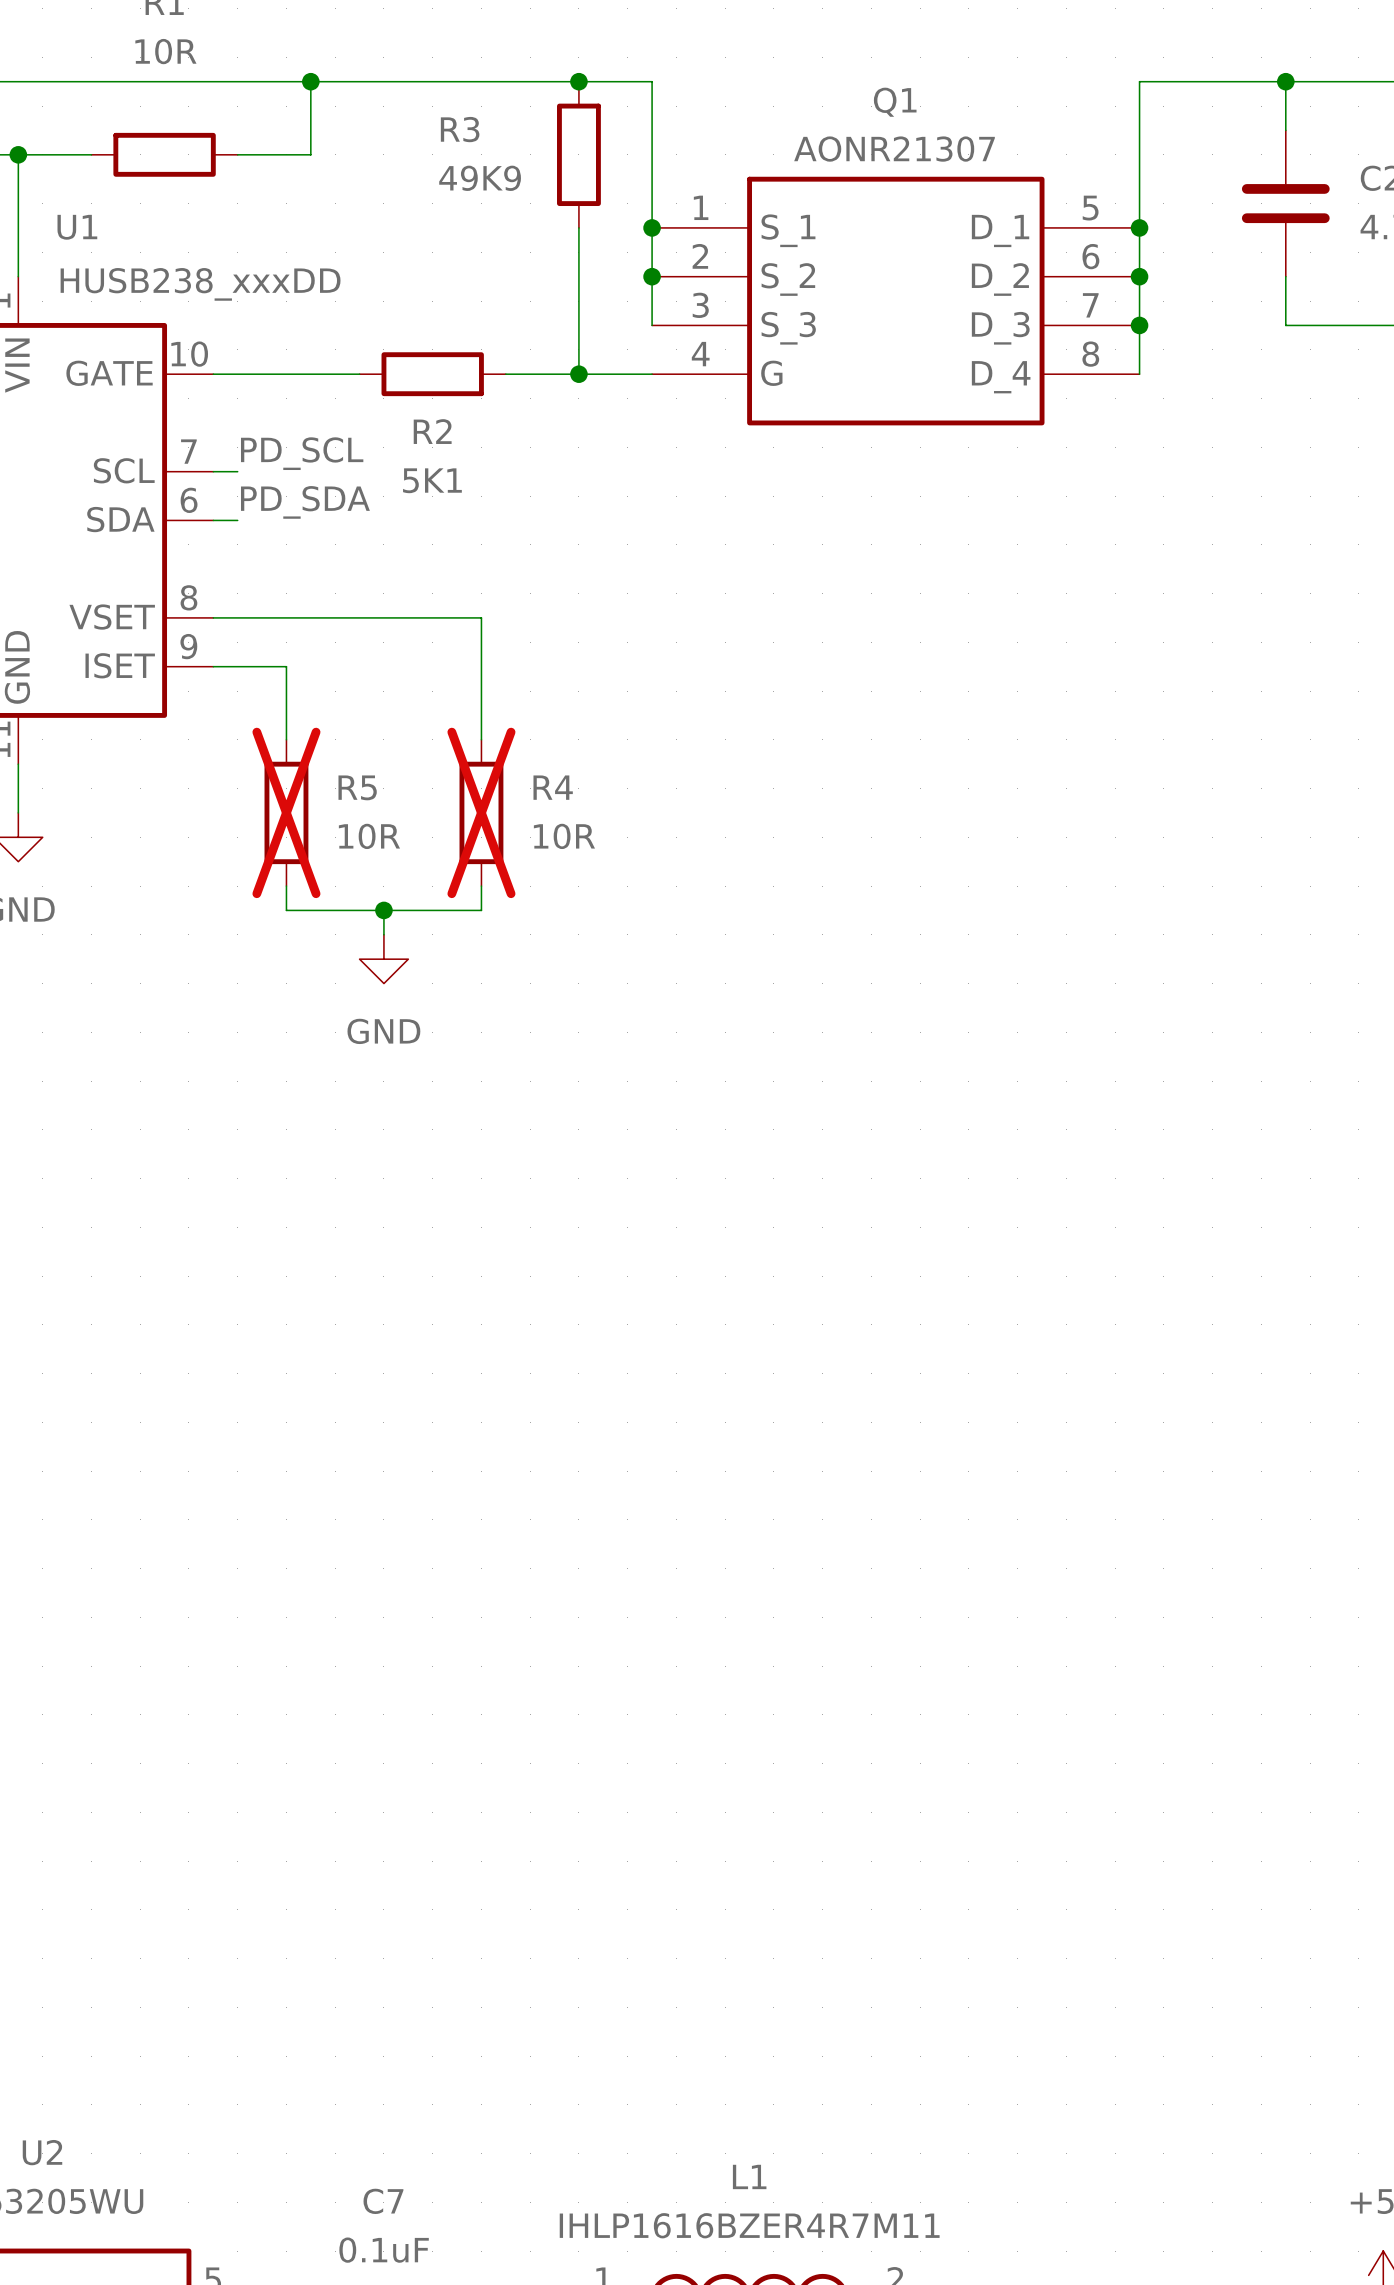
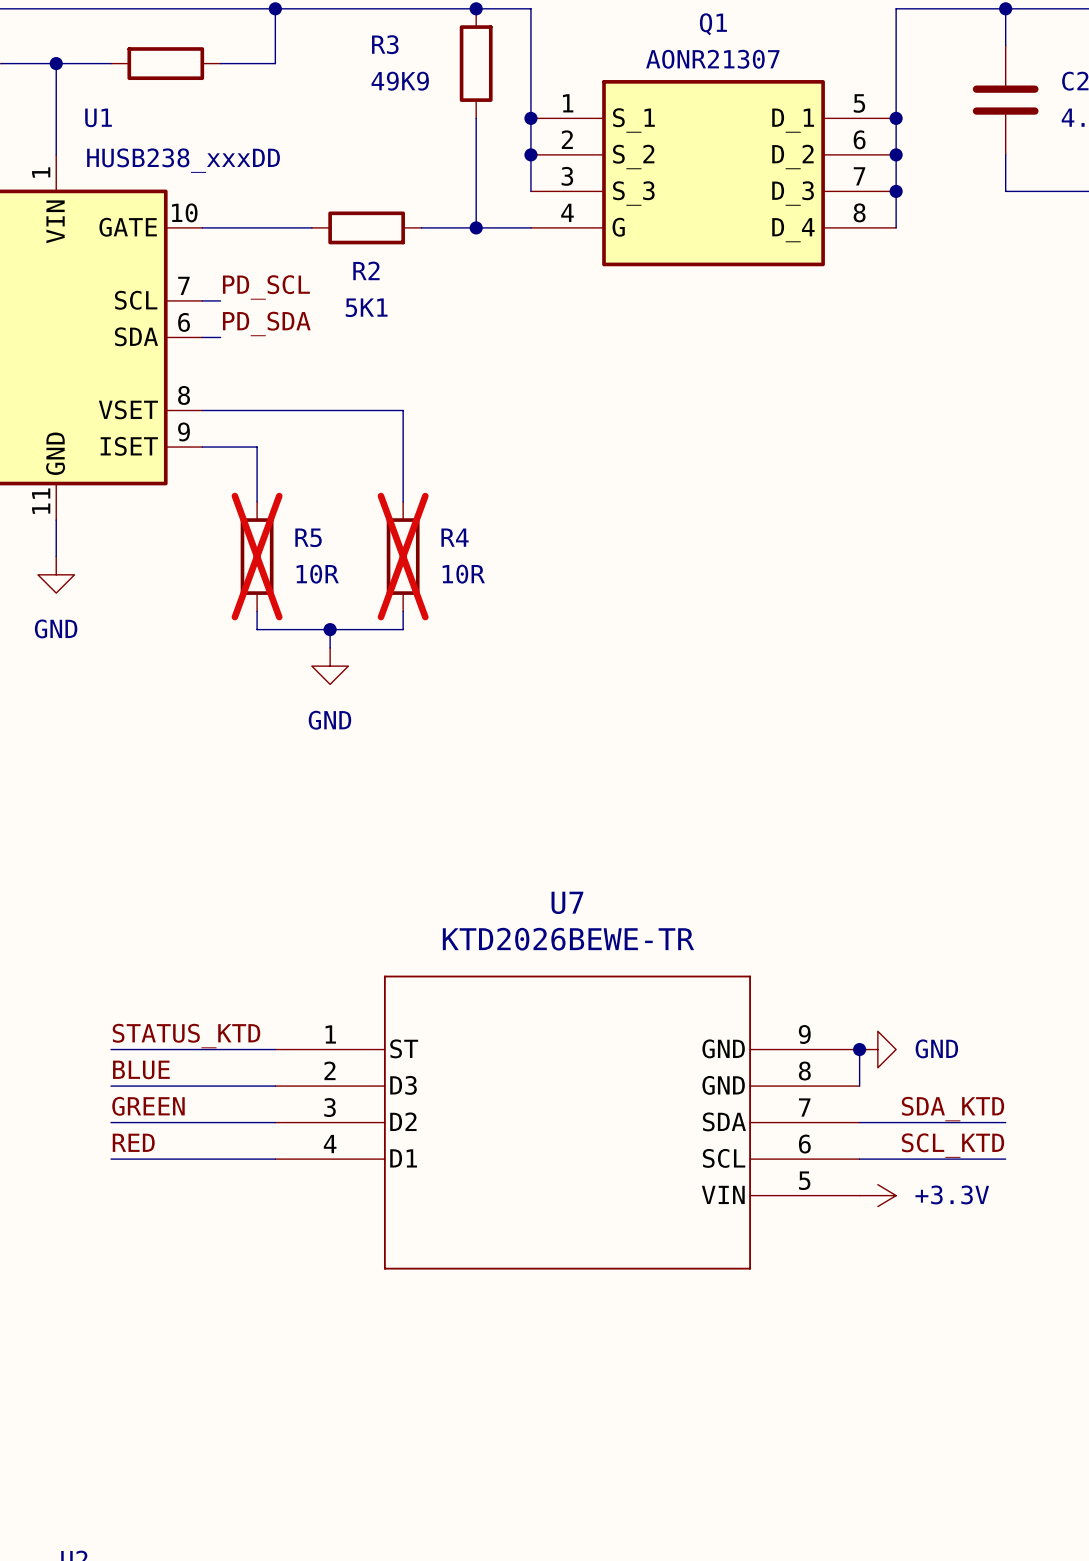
label: none -> STATUS_KTD (186, 1036)
wire: none -> (111, 1049) (275, 1049)
wire: none -> (859, 1049) (859, 1086)
junction: none -> (859, 1049)
power symbol: none -> GND (877, 1049)
label: none -> BLUE (141, 1069)
wire: none -> (111, 1086) (275, 1086)
label: none -> GREEN (148, 1106)
label: none -> SDA_KTD (952, 1109)
wire: none -> (111, 1122) (275, 1122)
U7: none -> KTD2026BEWE-TR (567, 1122)
wire: none -> (859, 1122) (1005, 1122)
label: none -> RED (133, 1142)
label: none -> SCL_KTD (952, 1145)
wire: none -> (111, 1159) (275, 1159)
wire: none -> (859, 1159) (1005, 1159)
power symbol: none -> +3.3V (877, 1195)

